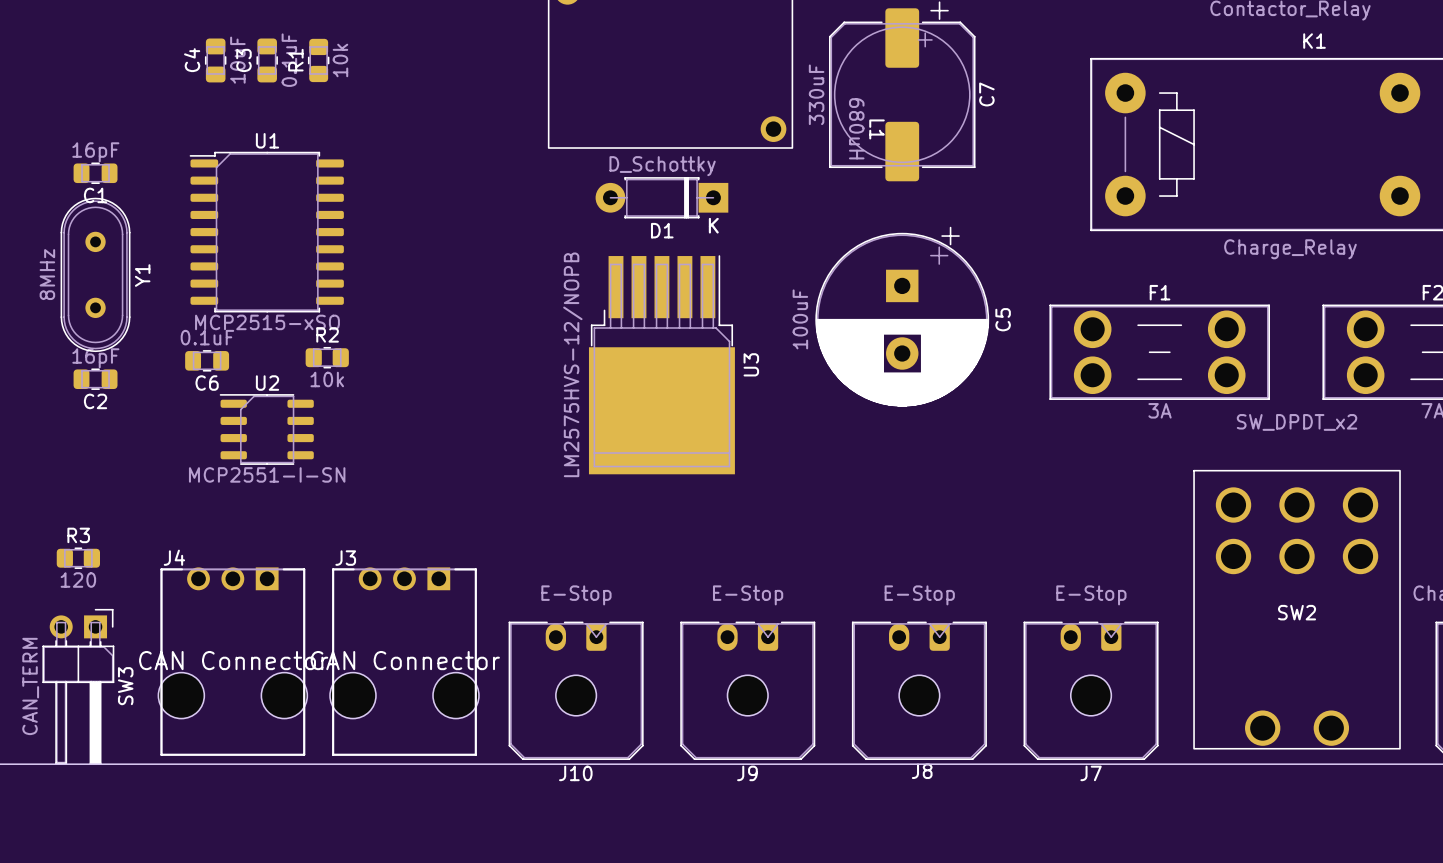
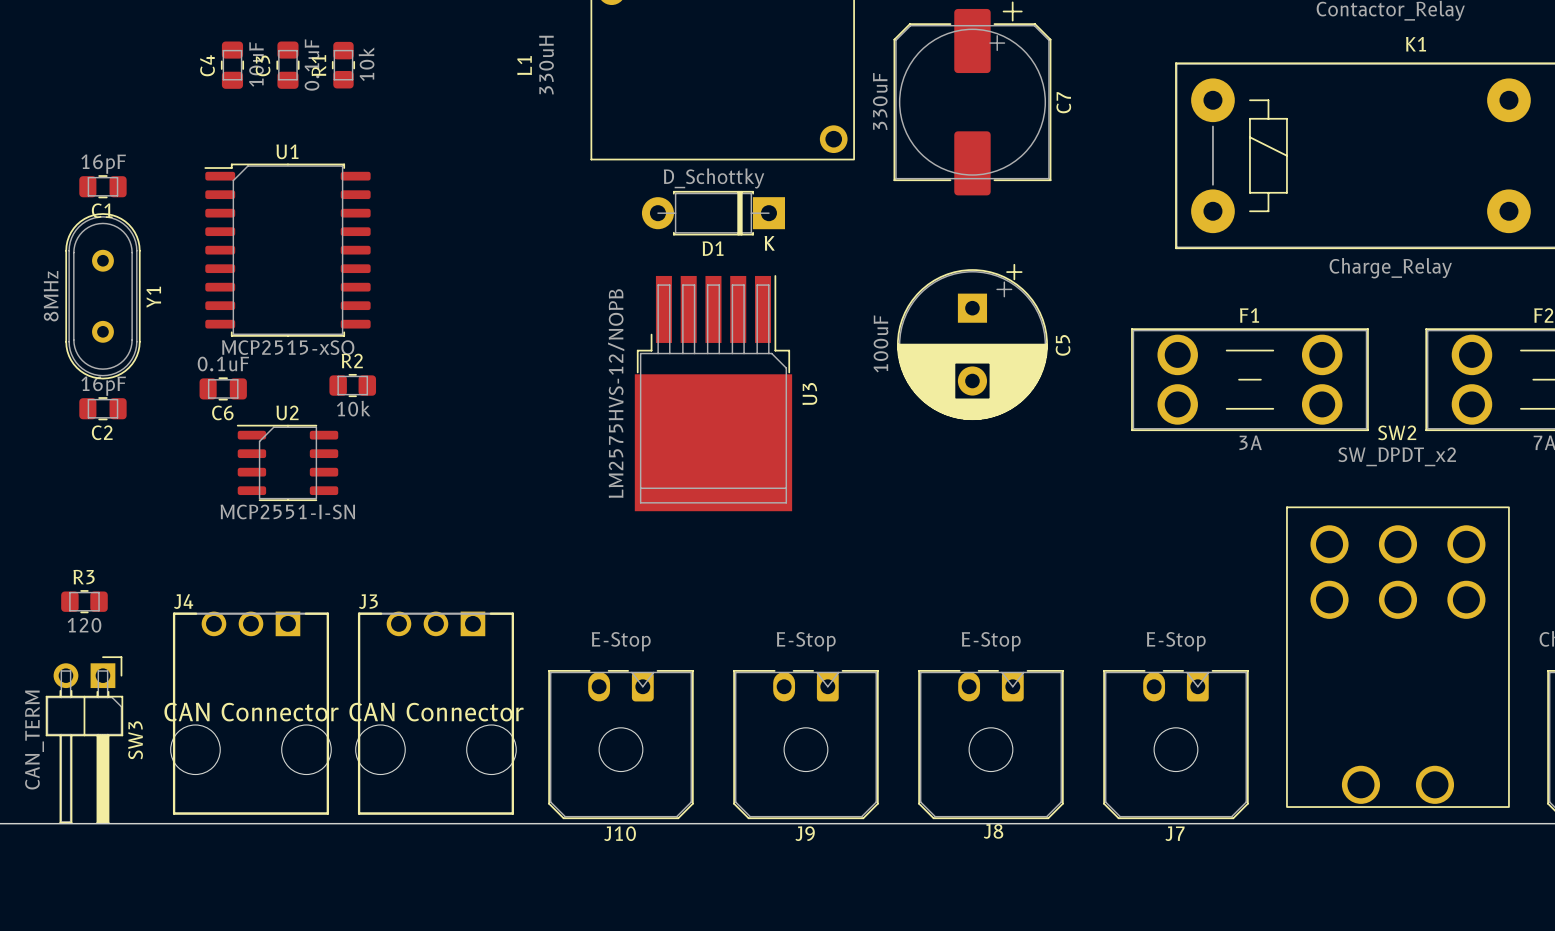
L1 value: 680uH (856, 128) -> 330uH (546, 65)
L1 name rotation: 0° (877, 129) -> 180° (524, 65)
L1 name position: L1 (877, 129) -> L1 (524, 65)
C5 footprint: [815, 226, 990, 407] -> [897, 263, 1048, 421]
SW2 name position: SW2 (1297, 612) -> SW2 (1397, 432)

